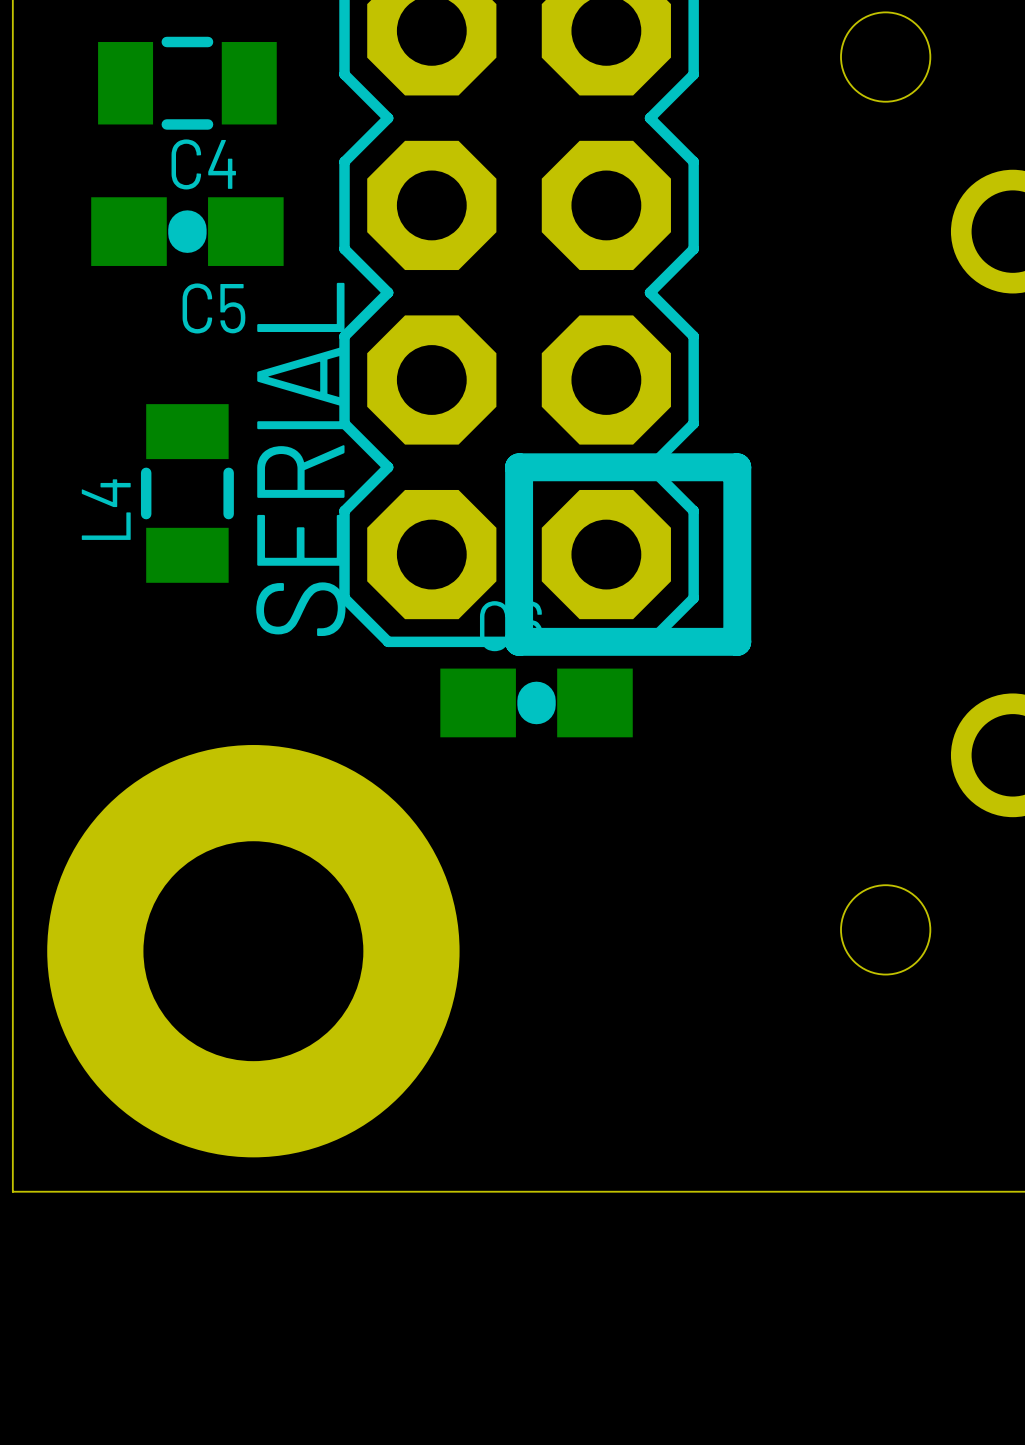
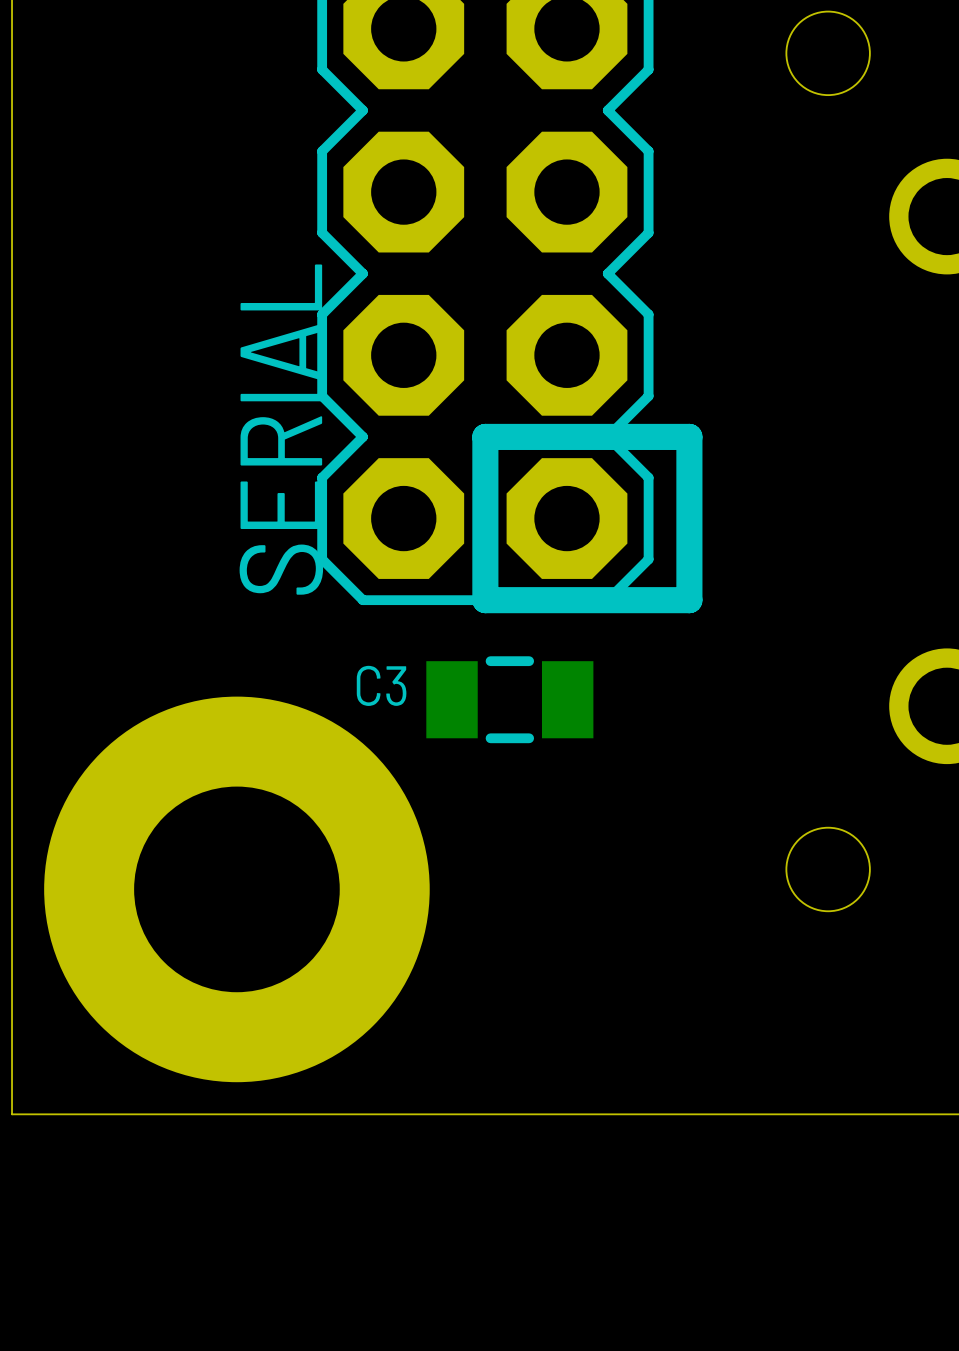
C4: (187, 83) -> none
C5: (187, 231) -> none
L4: (187, 493) -> none
part: (536, 702) -> none
C3: none -> (509, 699)

